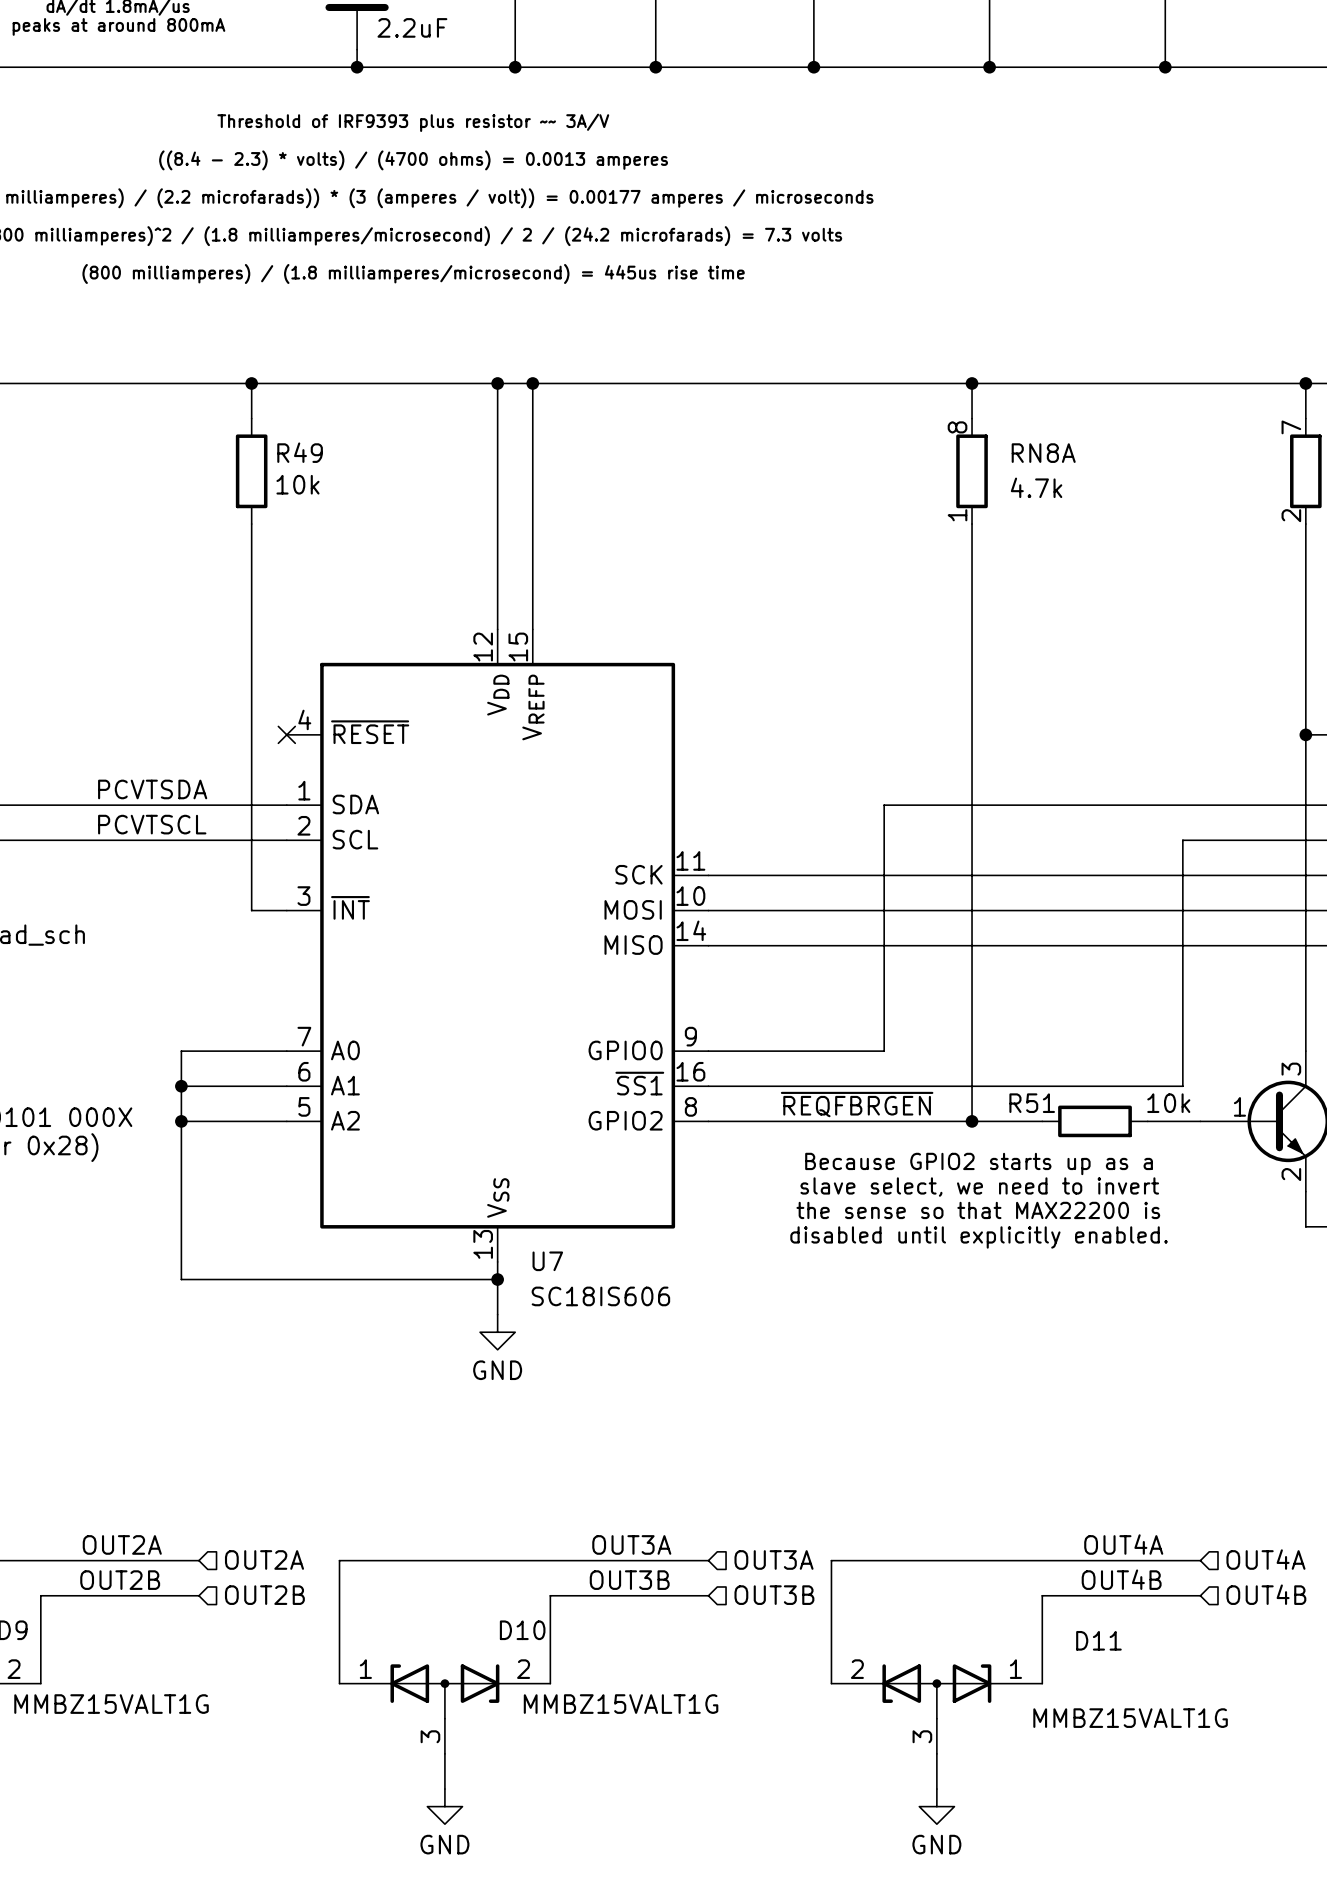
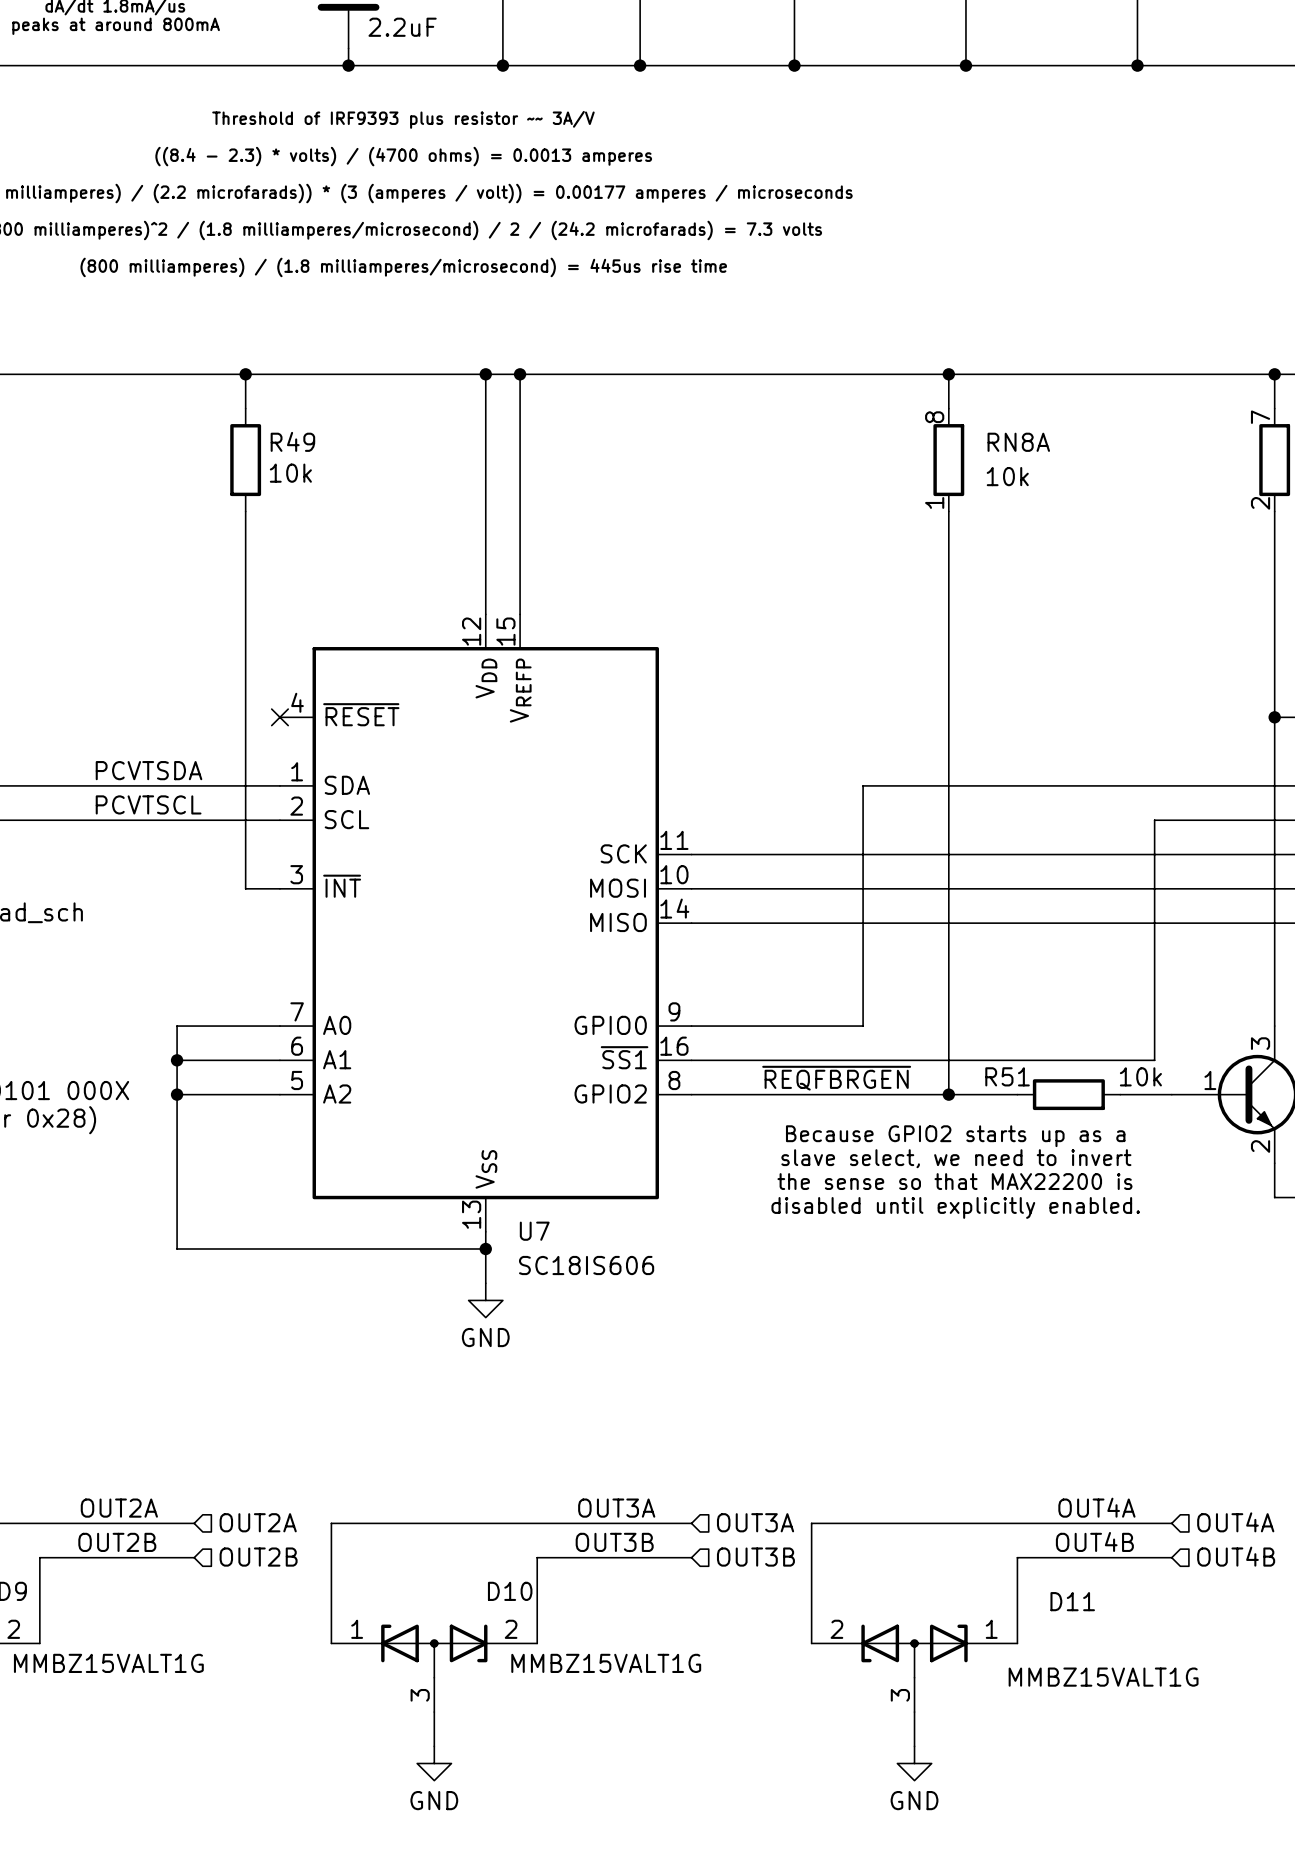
RN8A value: 4.7k (1036, 487) -> 10k (1007, 476)

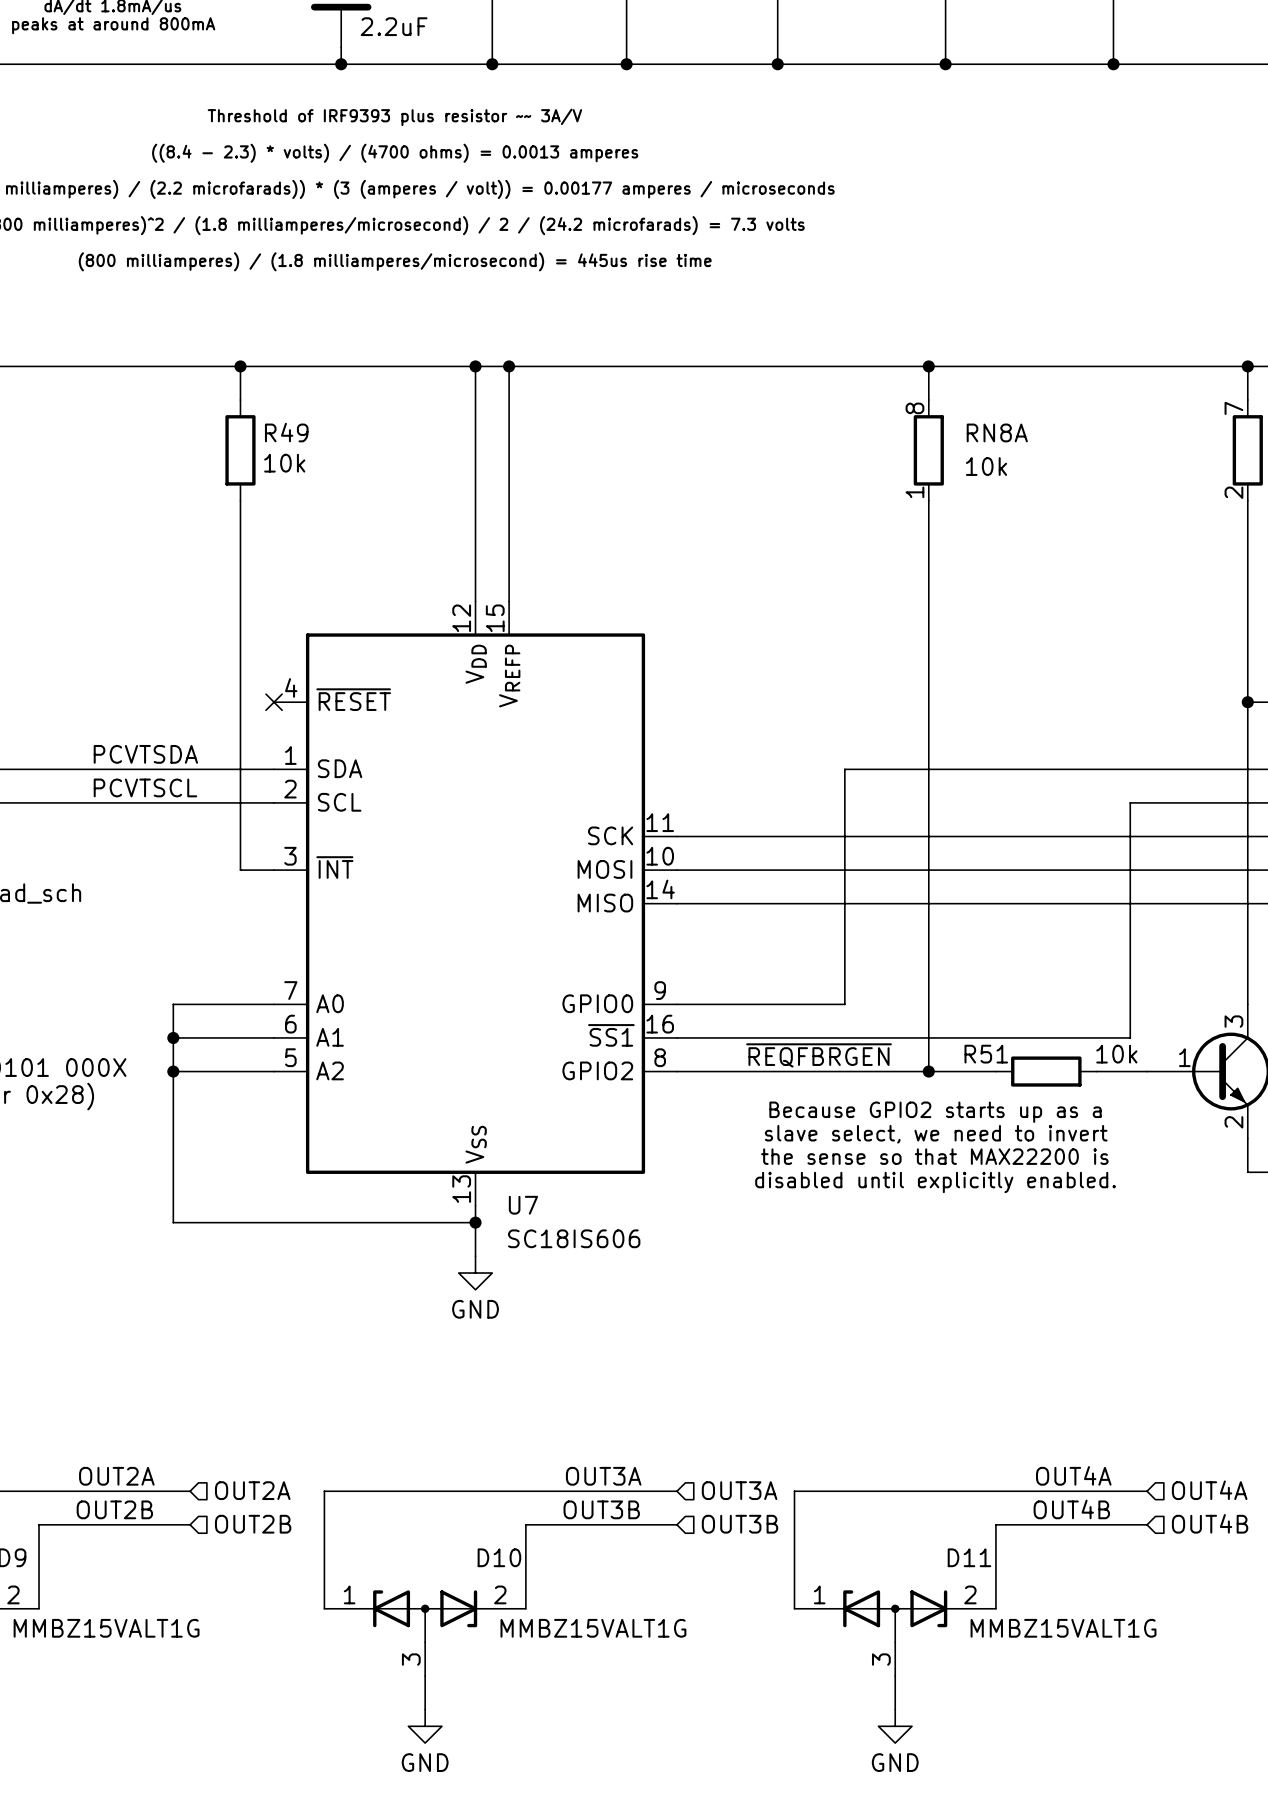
D11 name position: D11 (1072, 1601) -> D11 (969, 1557)
D11 flip: as is (914, 1651) -> left-right (895, 1616)

